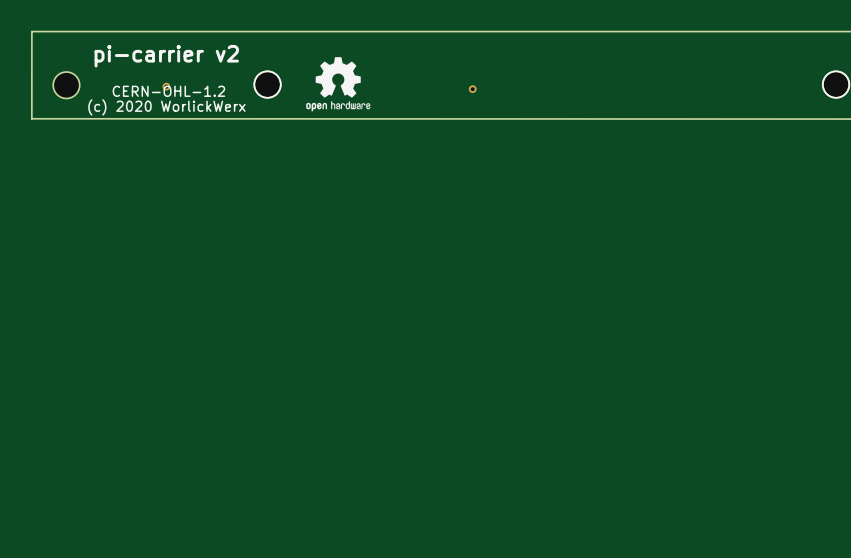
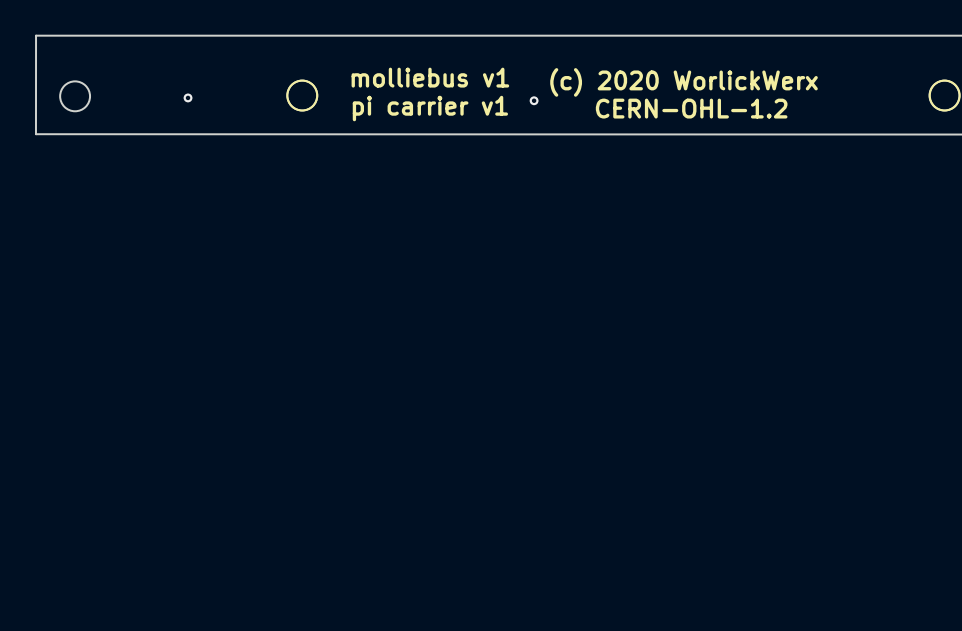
text: pi-carrier v2 (166, 56) -> none
drawing: [306, 57, 371, 112] -> none
text: none -> molliebus v1 (430, 77)
text: none -> (c) 2020 WorlickWerx (684, 82)
text: CERN-OHL-1.2 (168, 91) -> none
text: none -> pi carrier v1 (430, 108)
text: none -> CERN-OHL-1.2 (691, 108)
text: (c) 2020 WorlickWerx (166, 107) -> none

